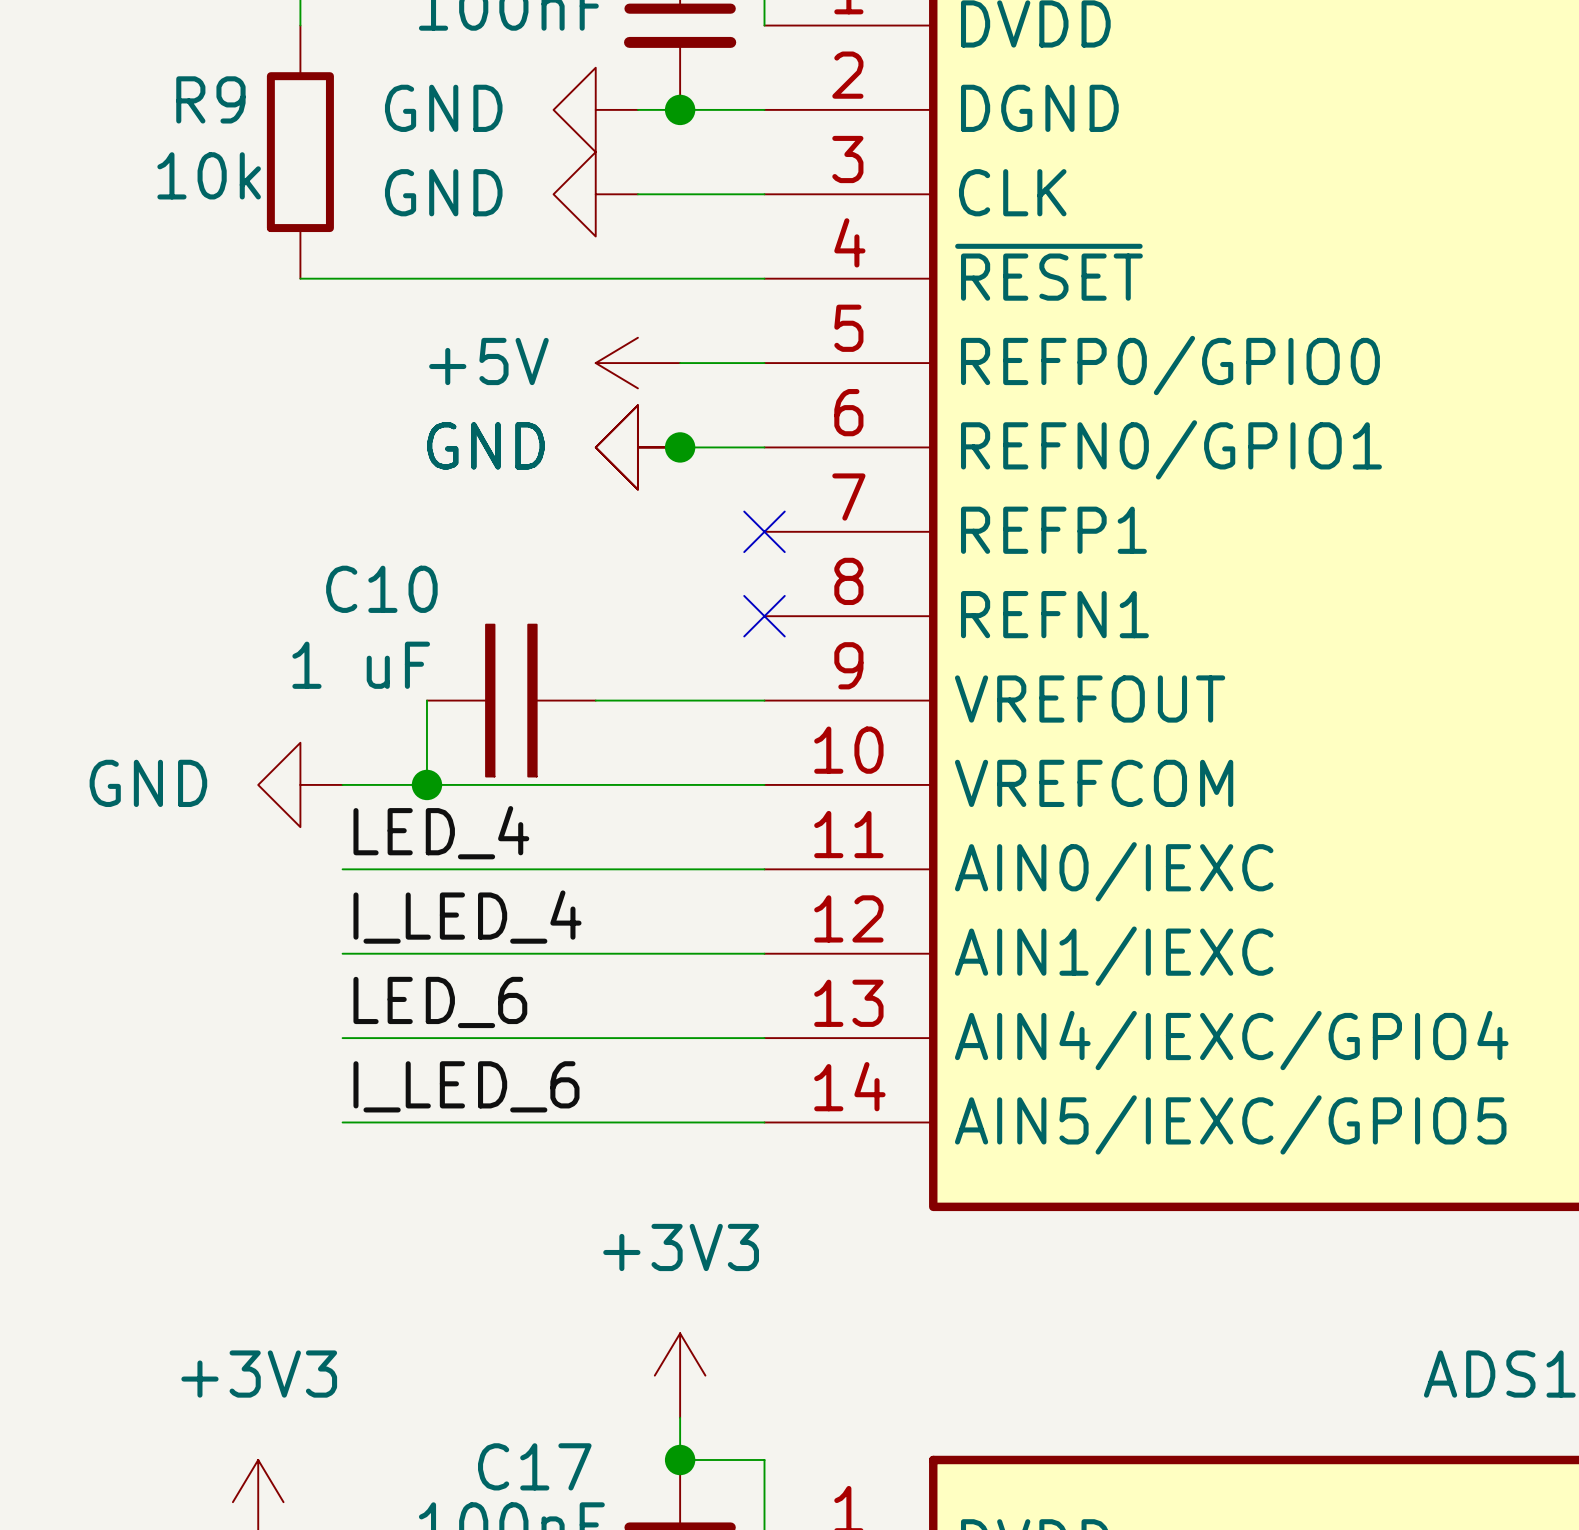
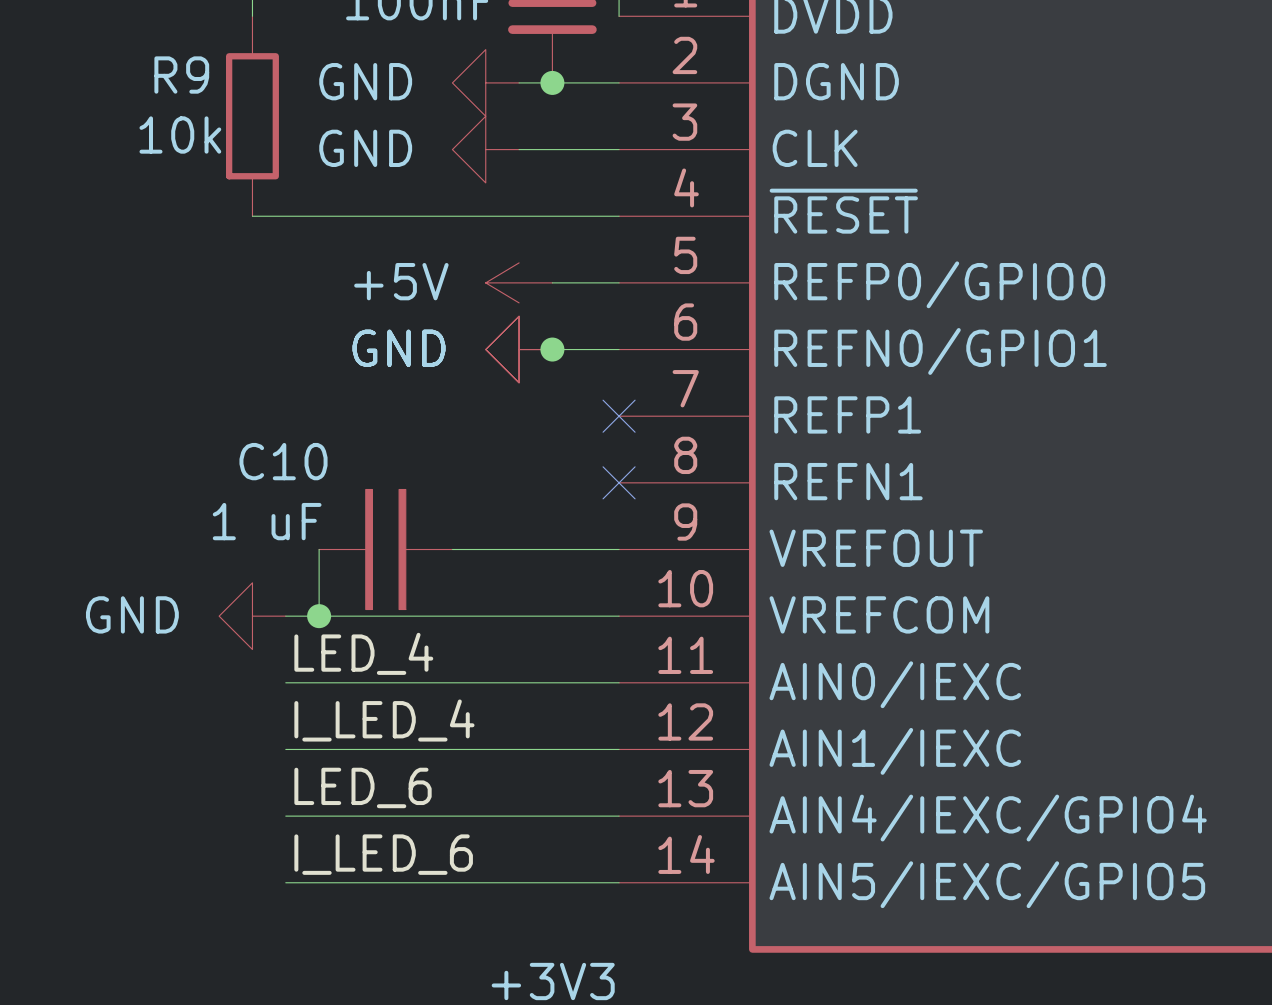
wire: (426, 700) (426, 784) -> (319, 549) (319, 616)
C10 position: (511, 700) -> (385, 549)
junction position: (426, 784) -> (319, 616)

